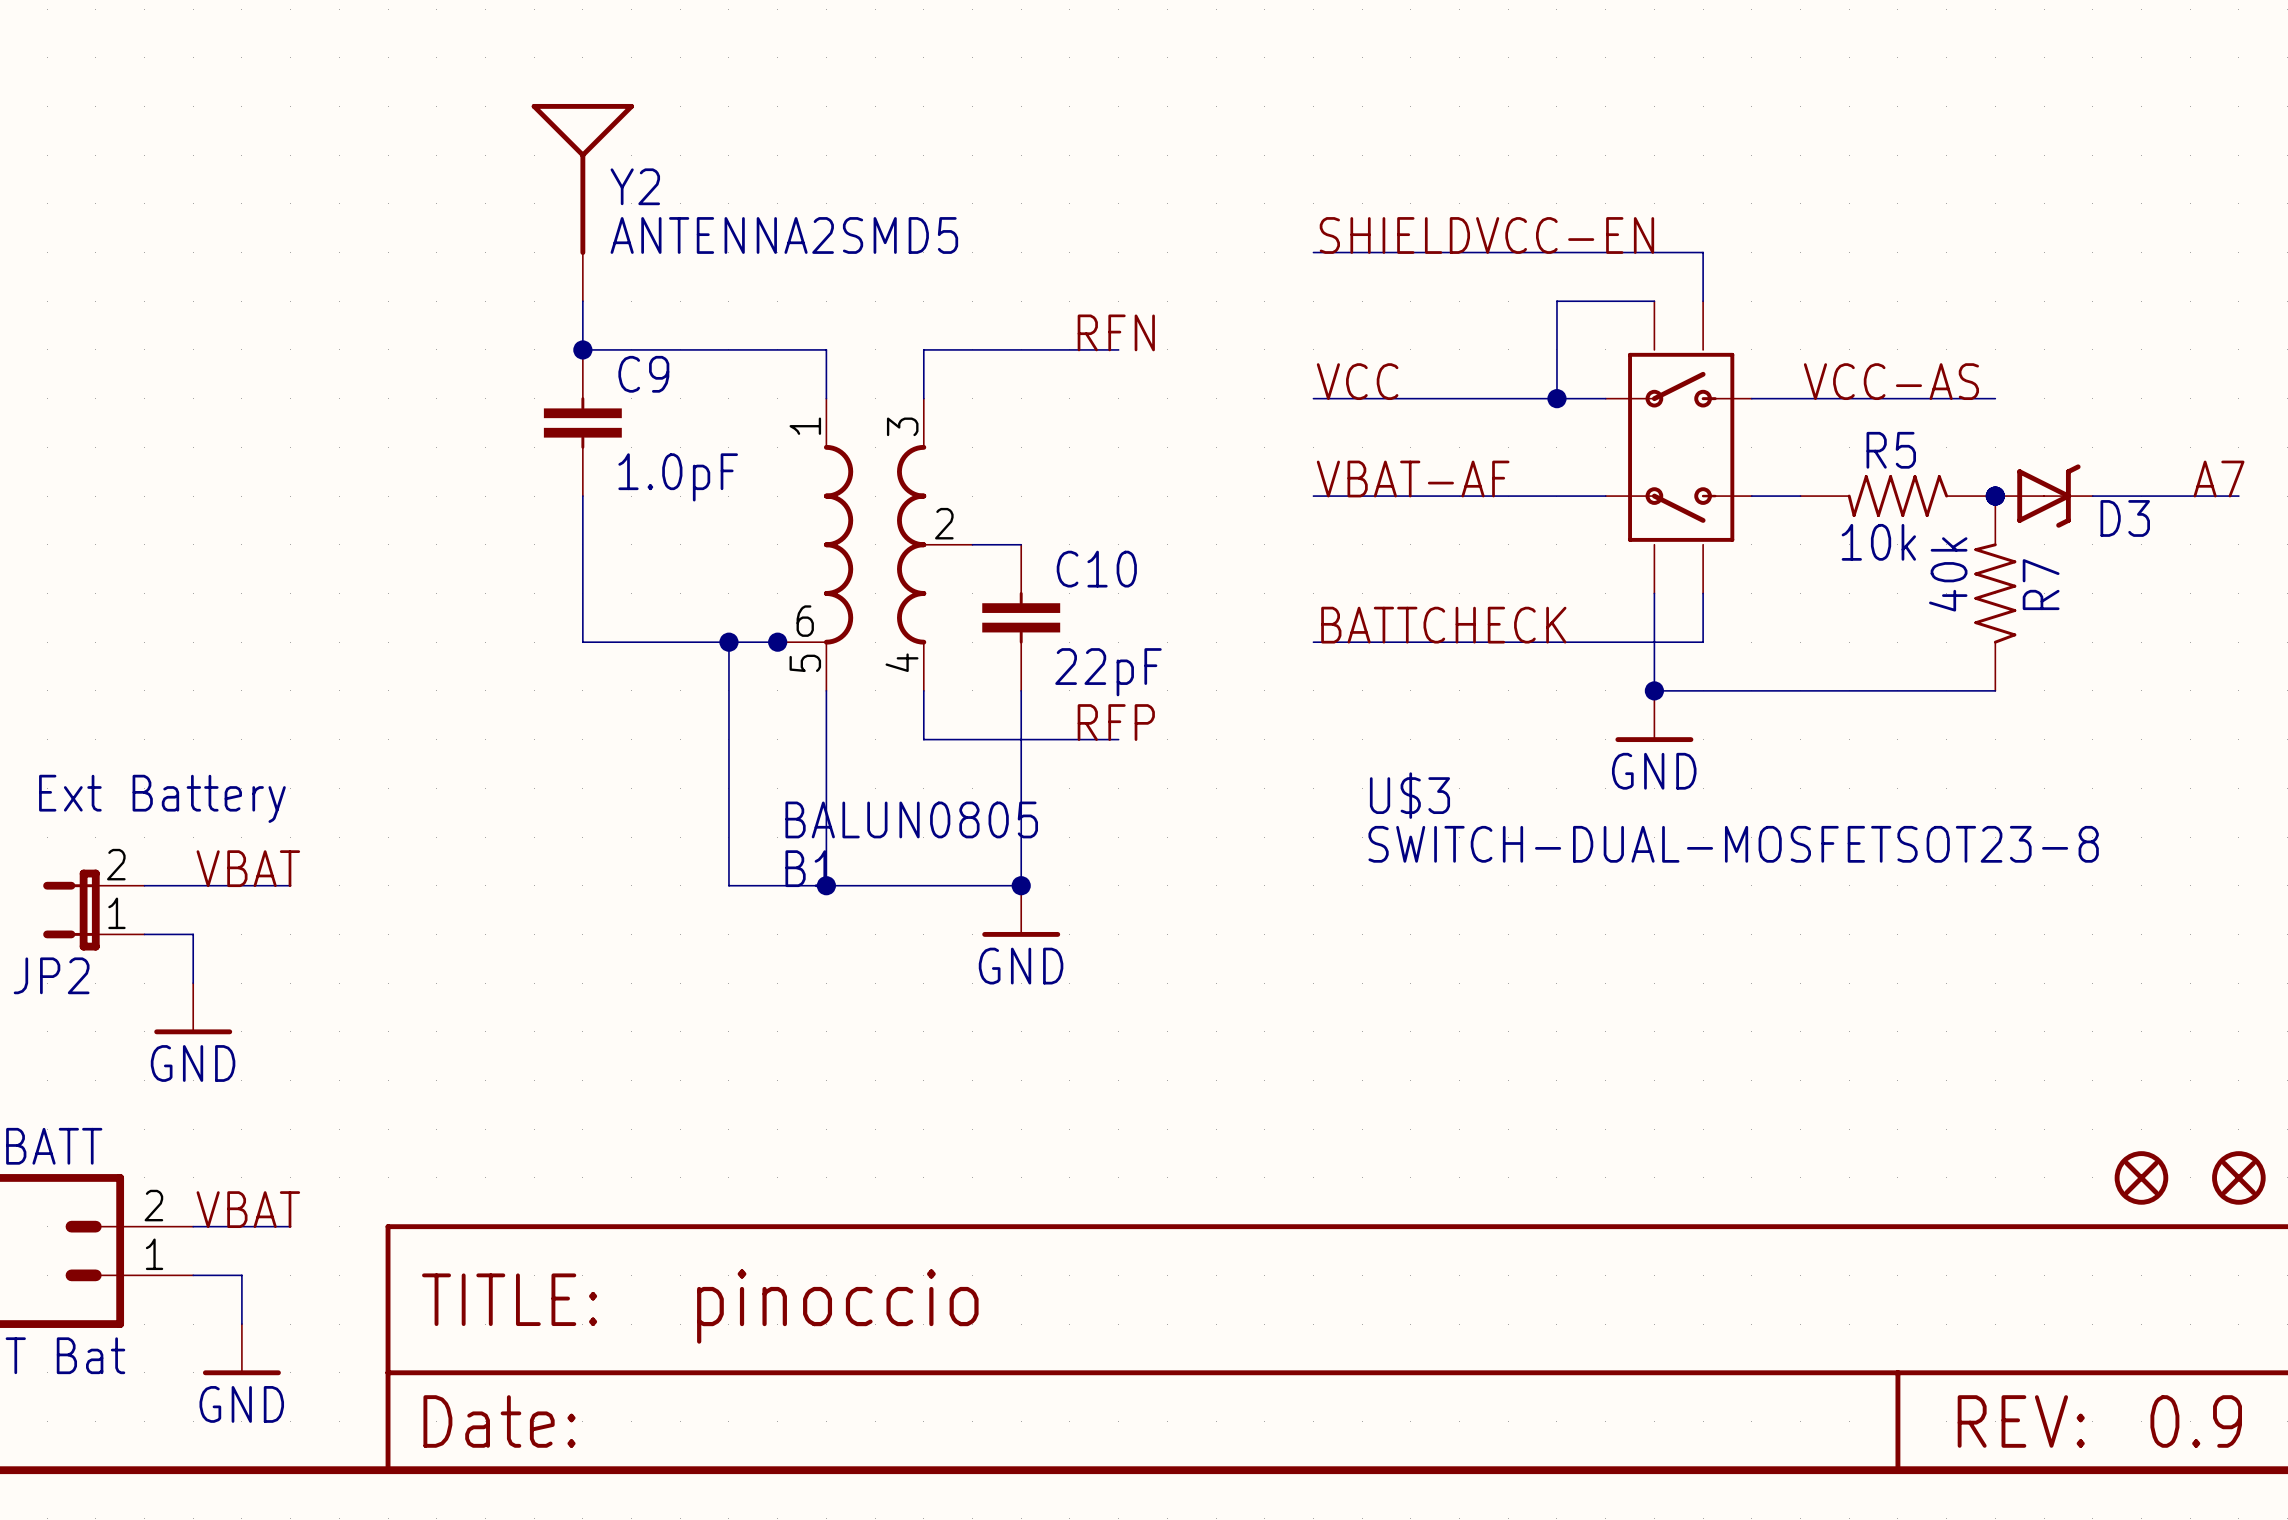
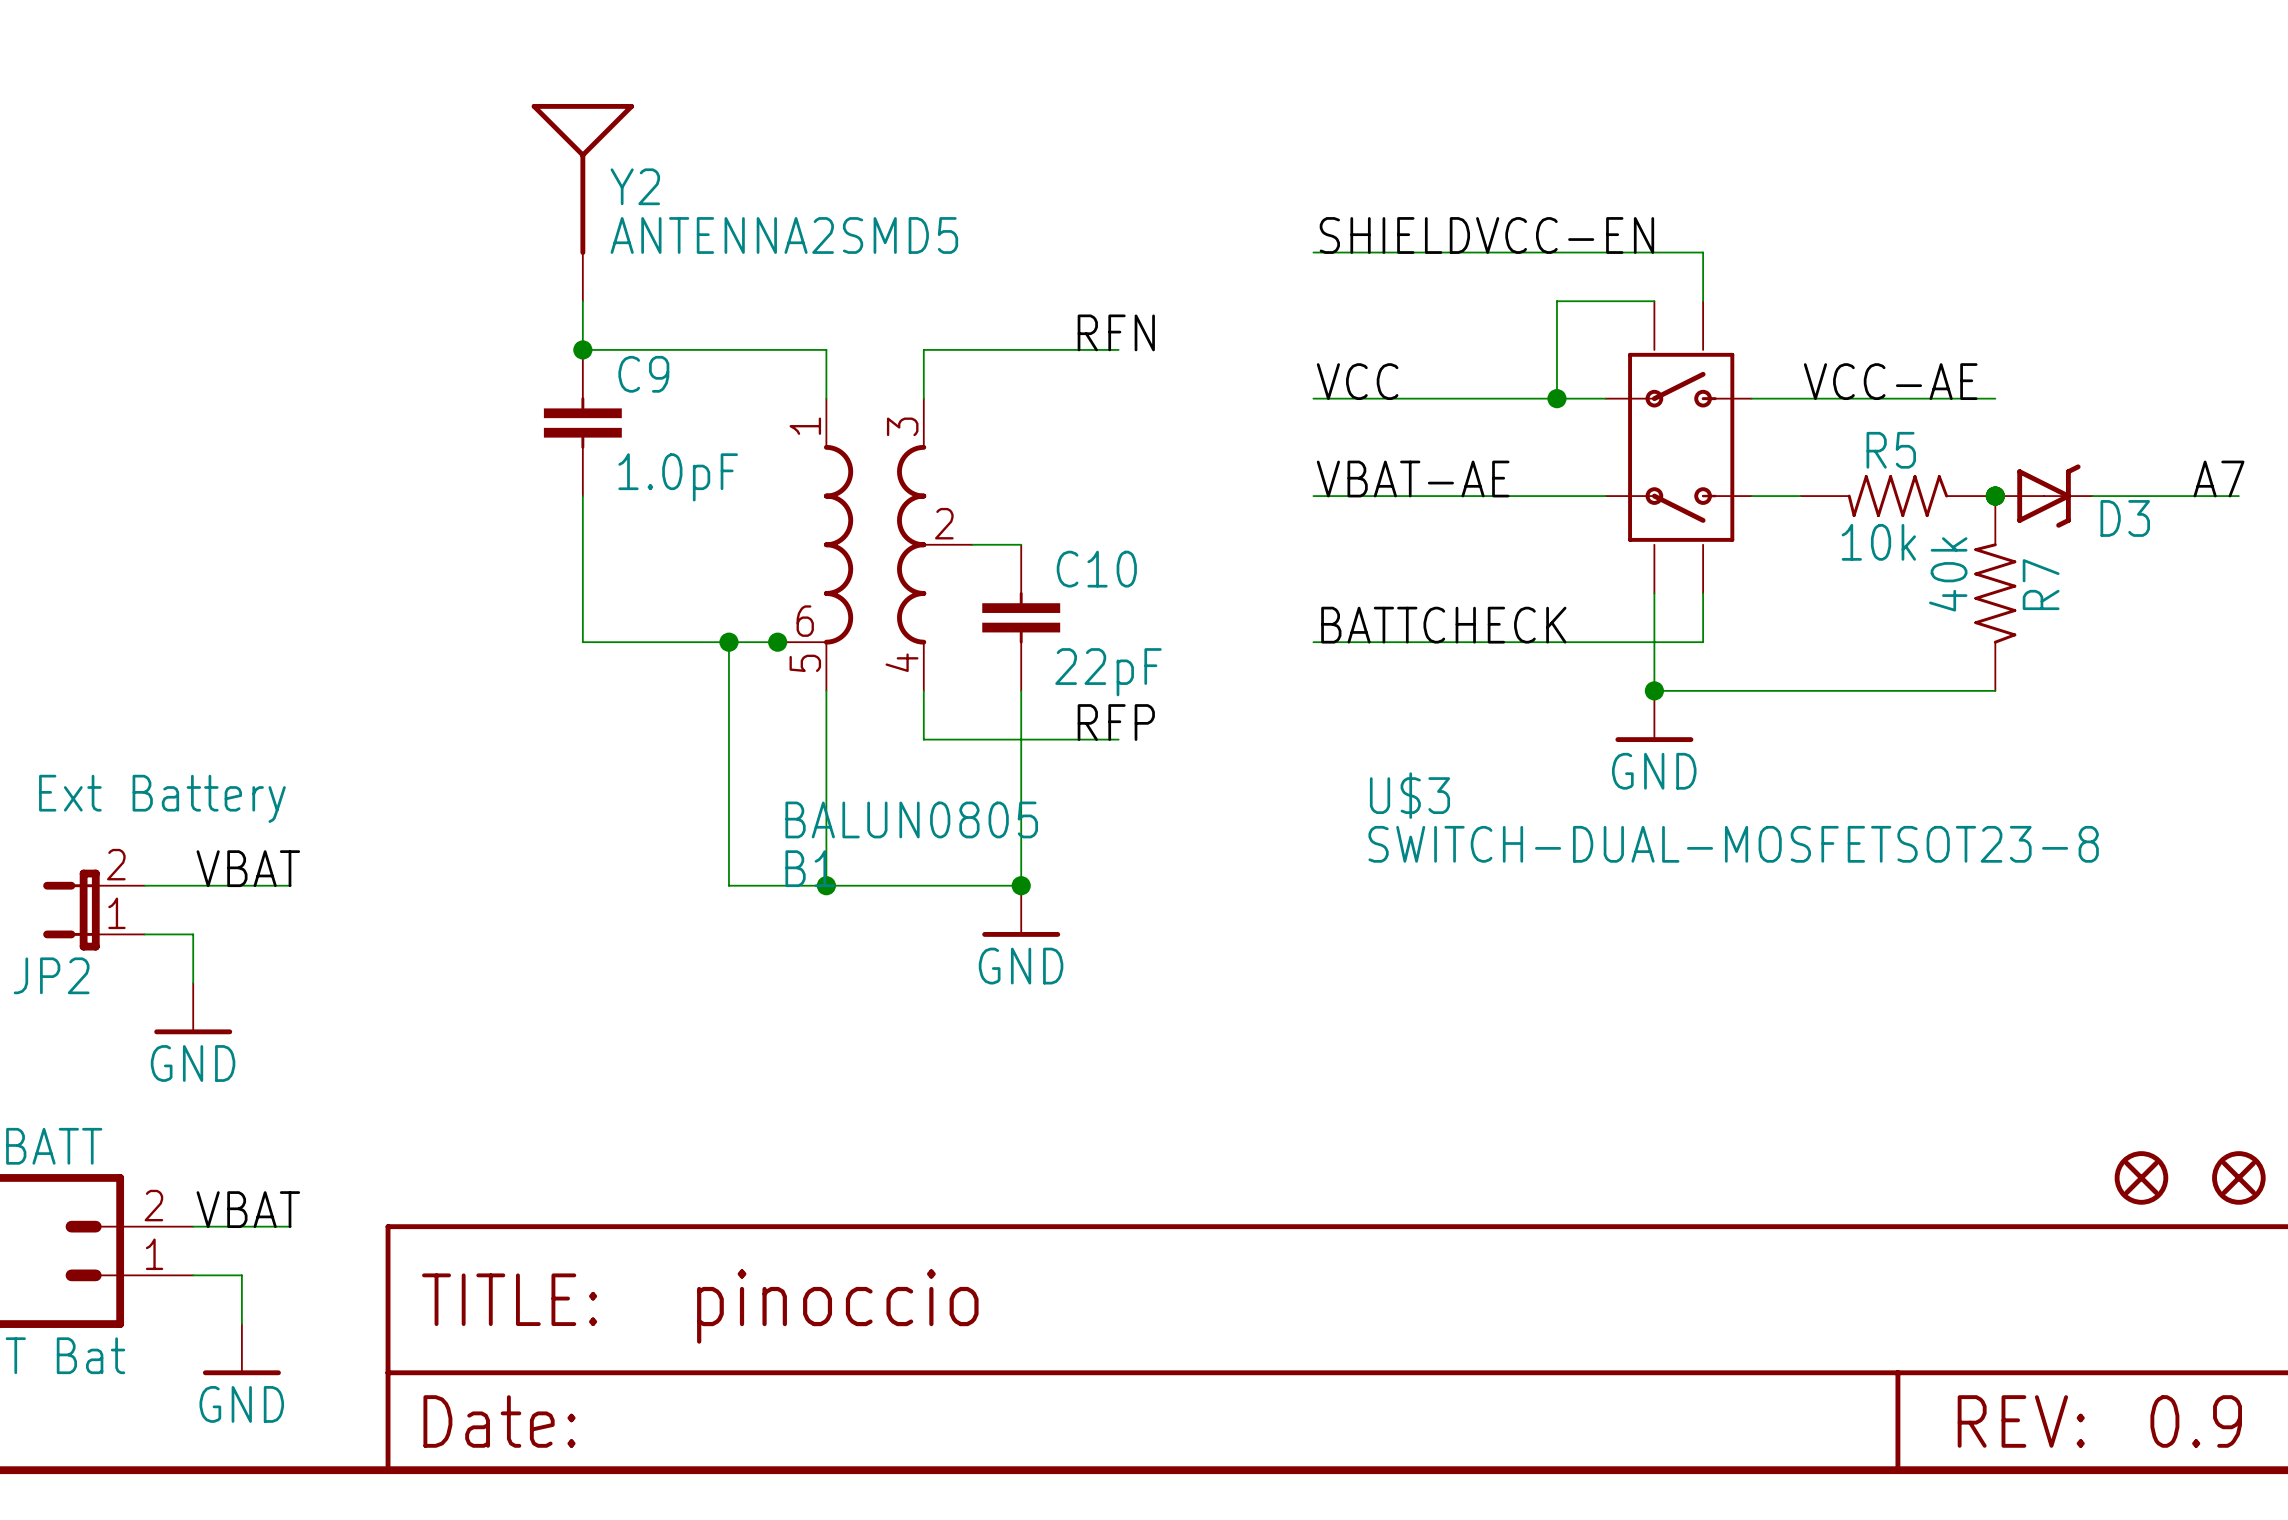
label: VCC-AS (1891, 381) -> VCC-AE (1890, 381)
label: VBAT-AF (1413, 479) -> VBAT-AE (1413, 479)

